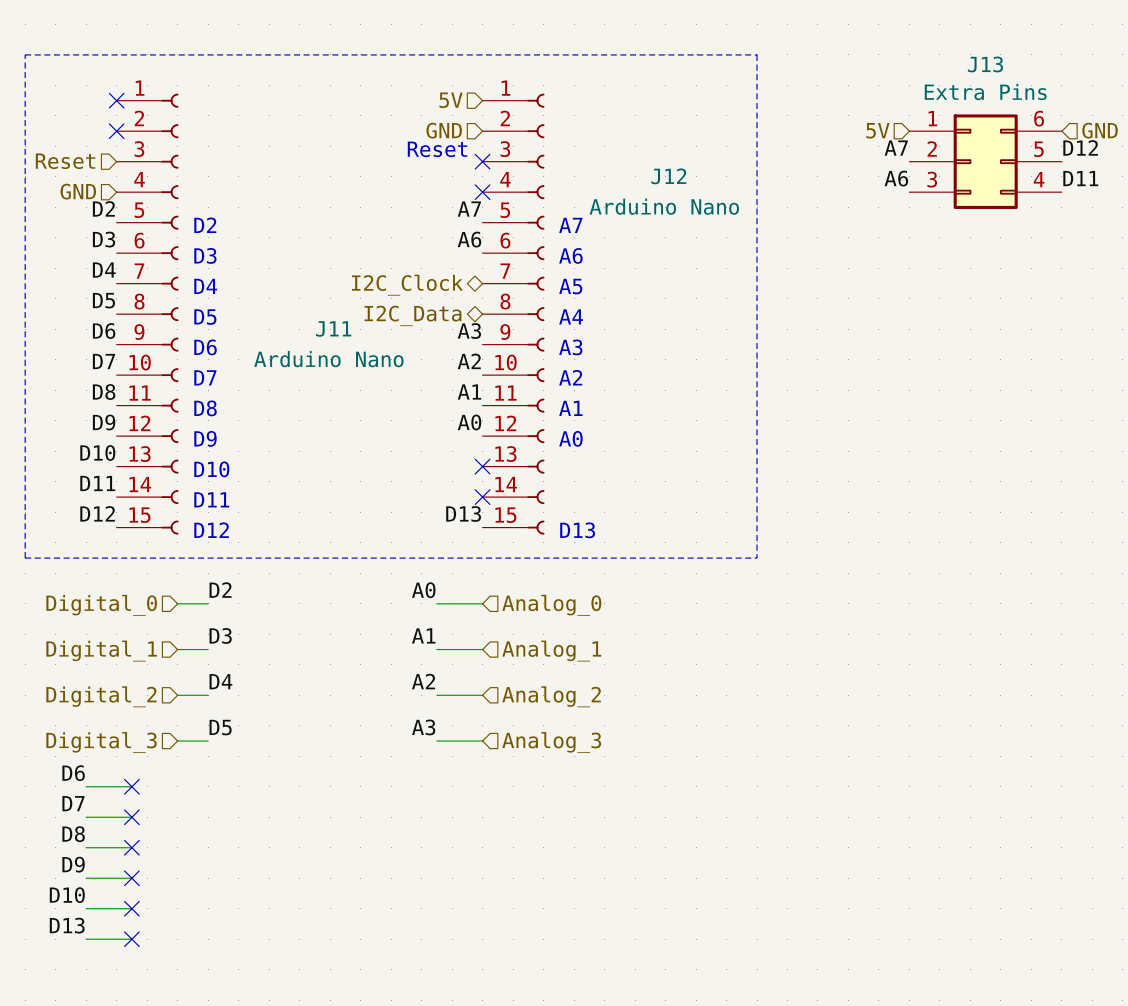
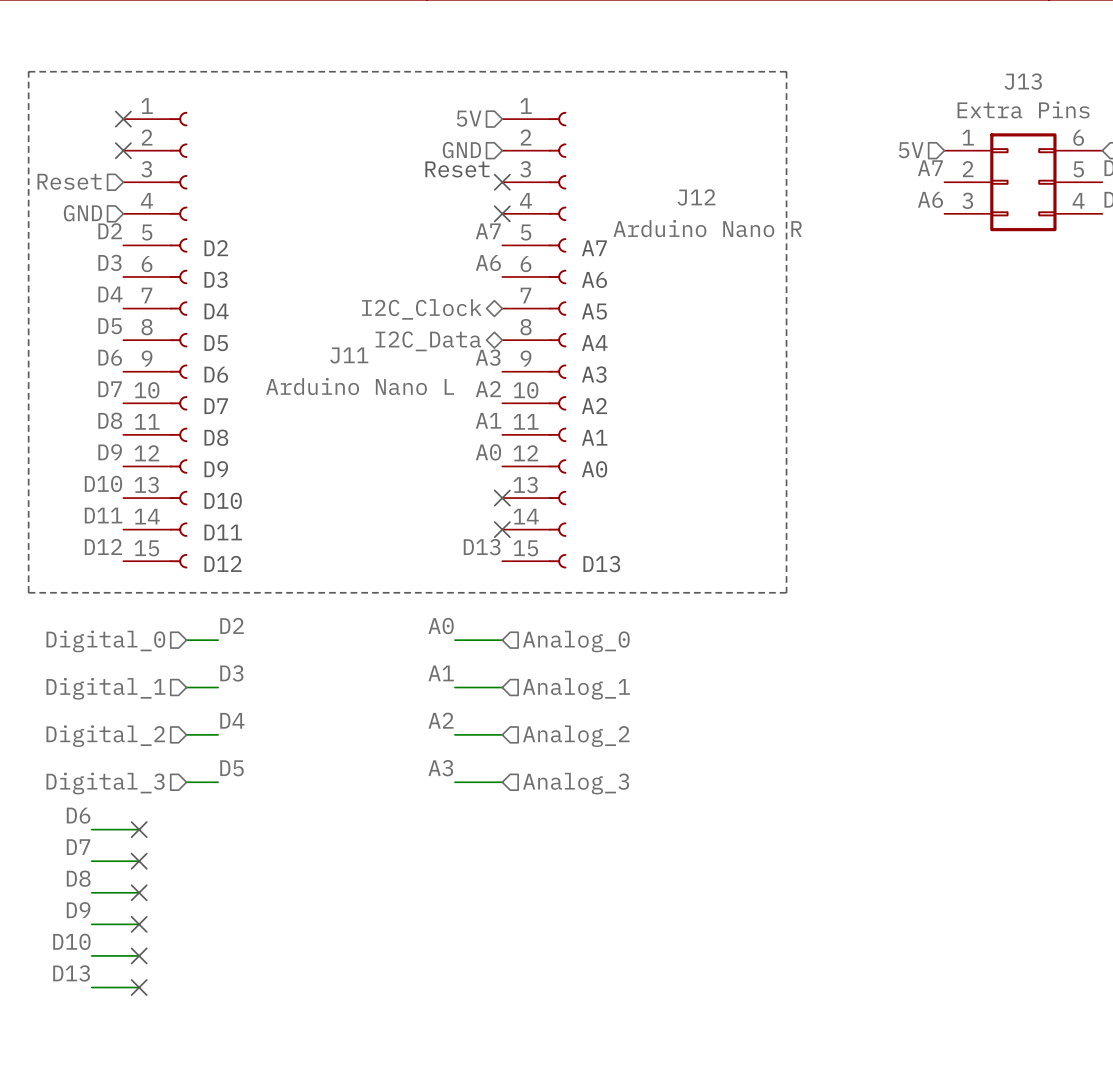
J12 value: Arduino Nano (664, 206) -> Arduino Nano R (707, 228)
J11 value: Arduino Nano (328, 359) -> Arduino Nano L (360, 386)

